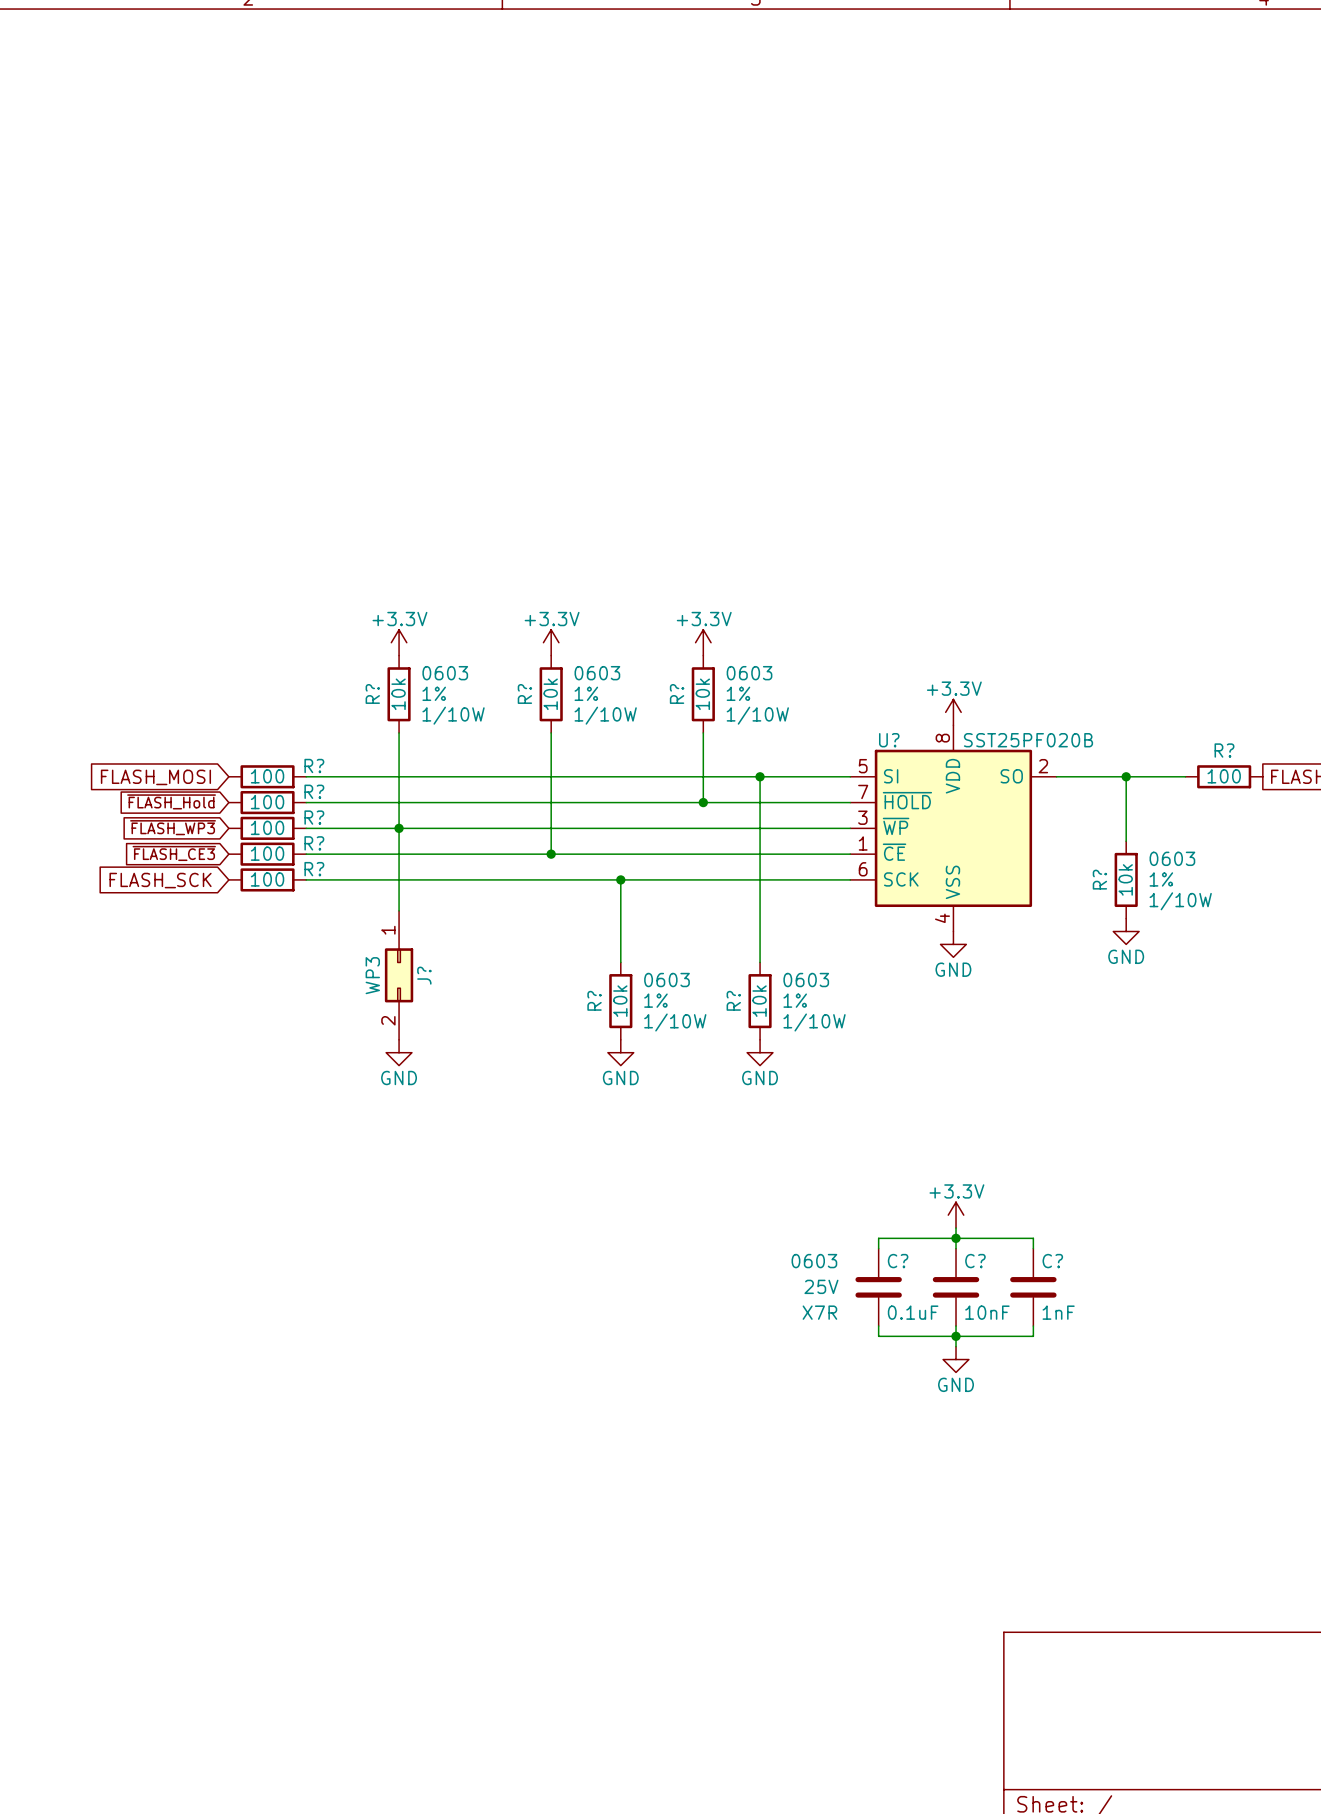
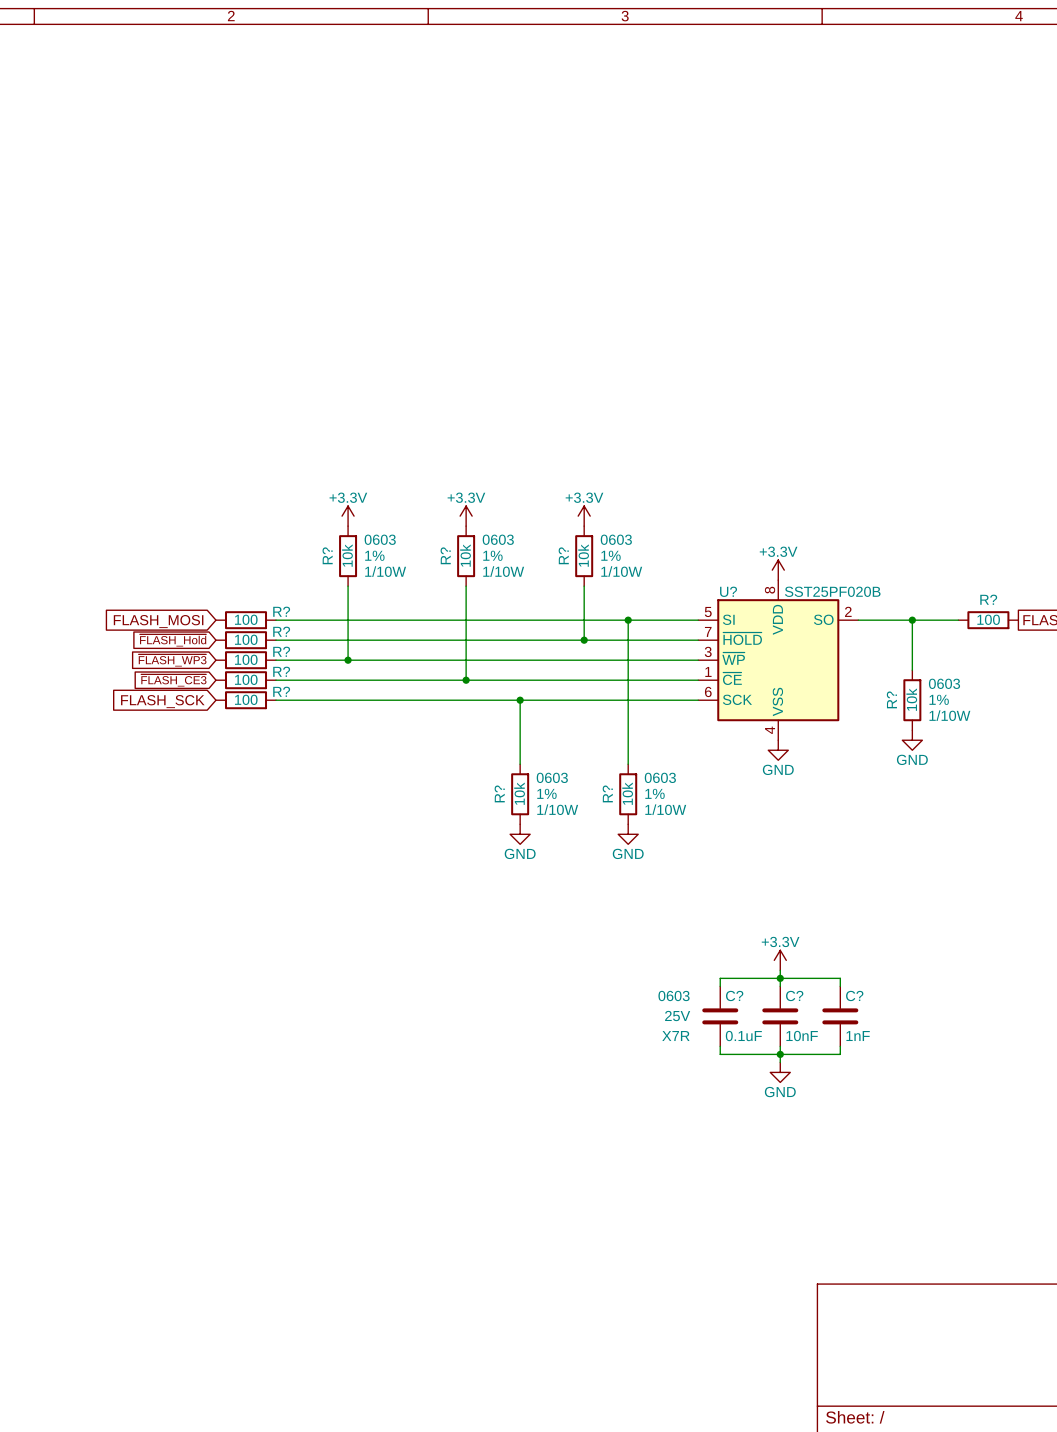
wire: (399, 828) (399, 910) -> none
J?: WP3 (399, 975) -> none
power symbol: GND (399, 1052) -> none

